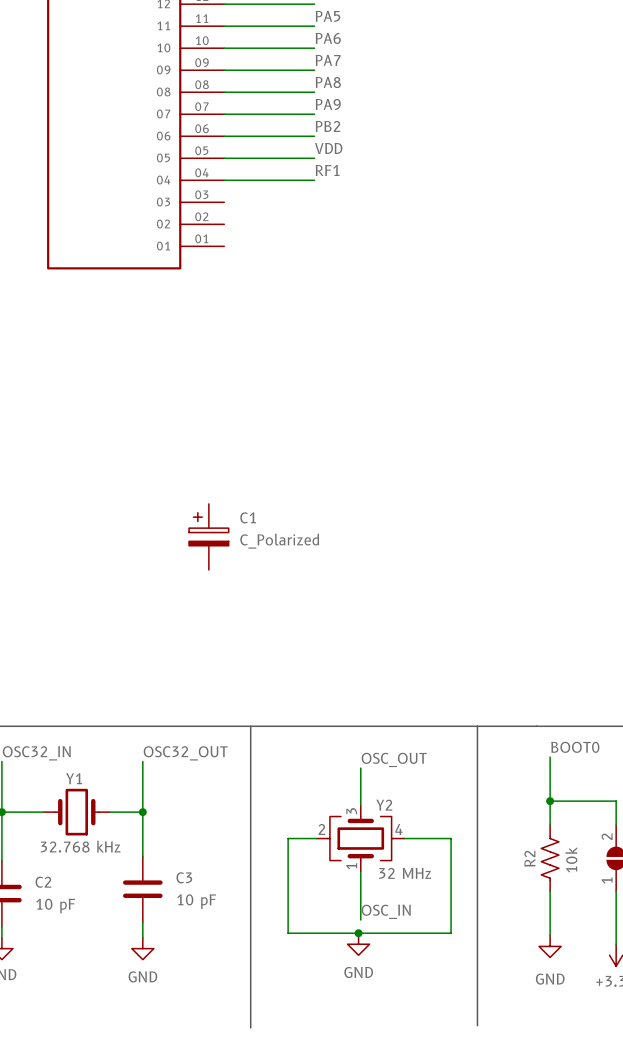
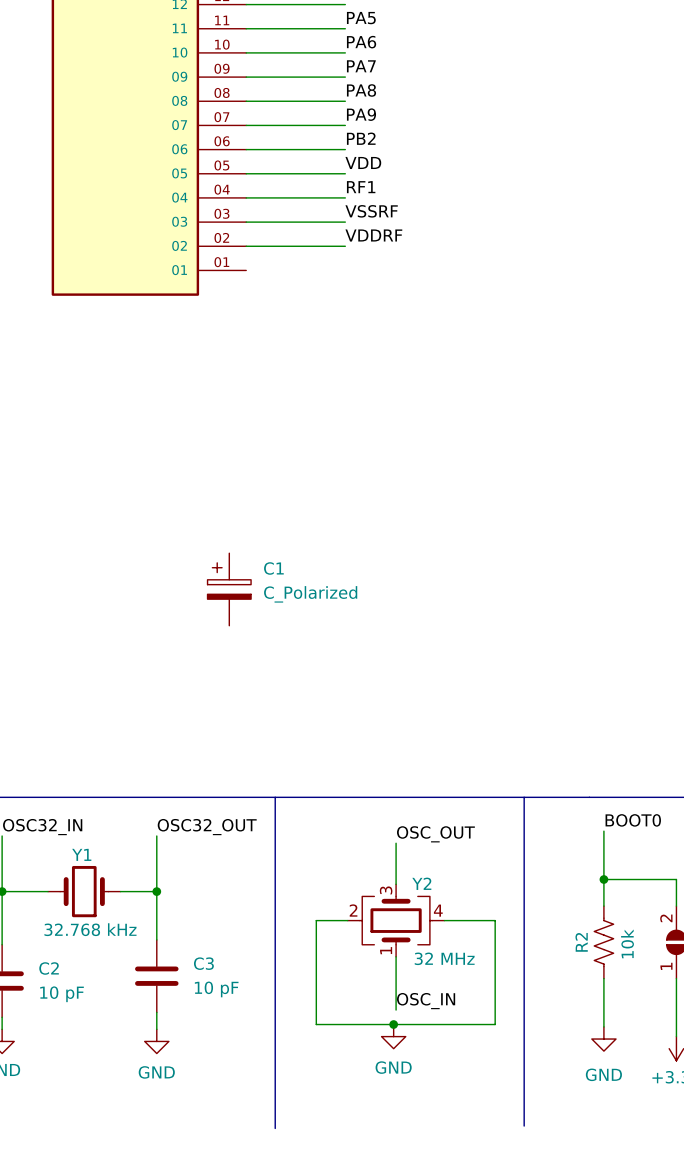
label: none -> VSSRF (371, 211)
wire: none -> (246, 222) (345, 222)
label: none -> VDDRF (373, 235)
wire: none -> (246, 246) (345, 246)

